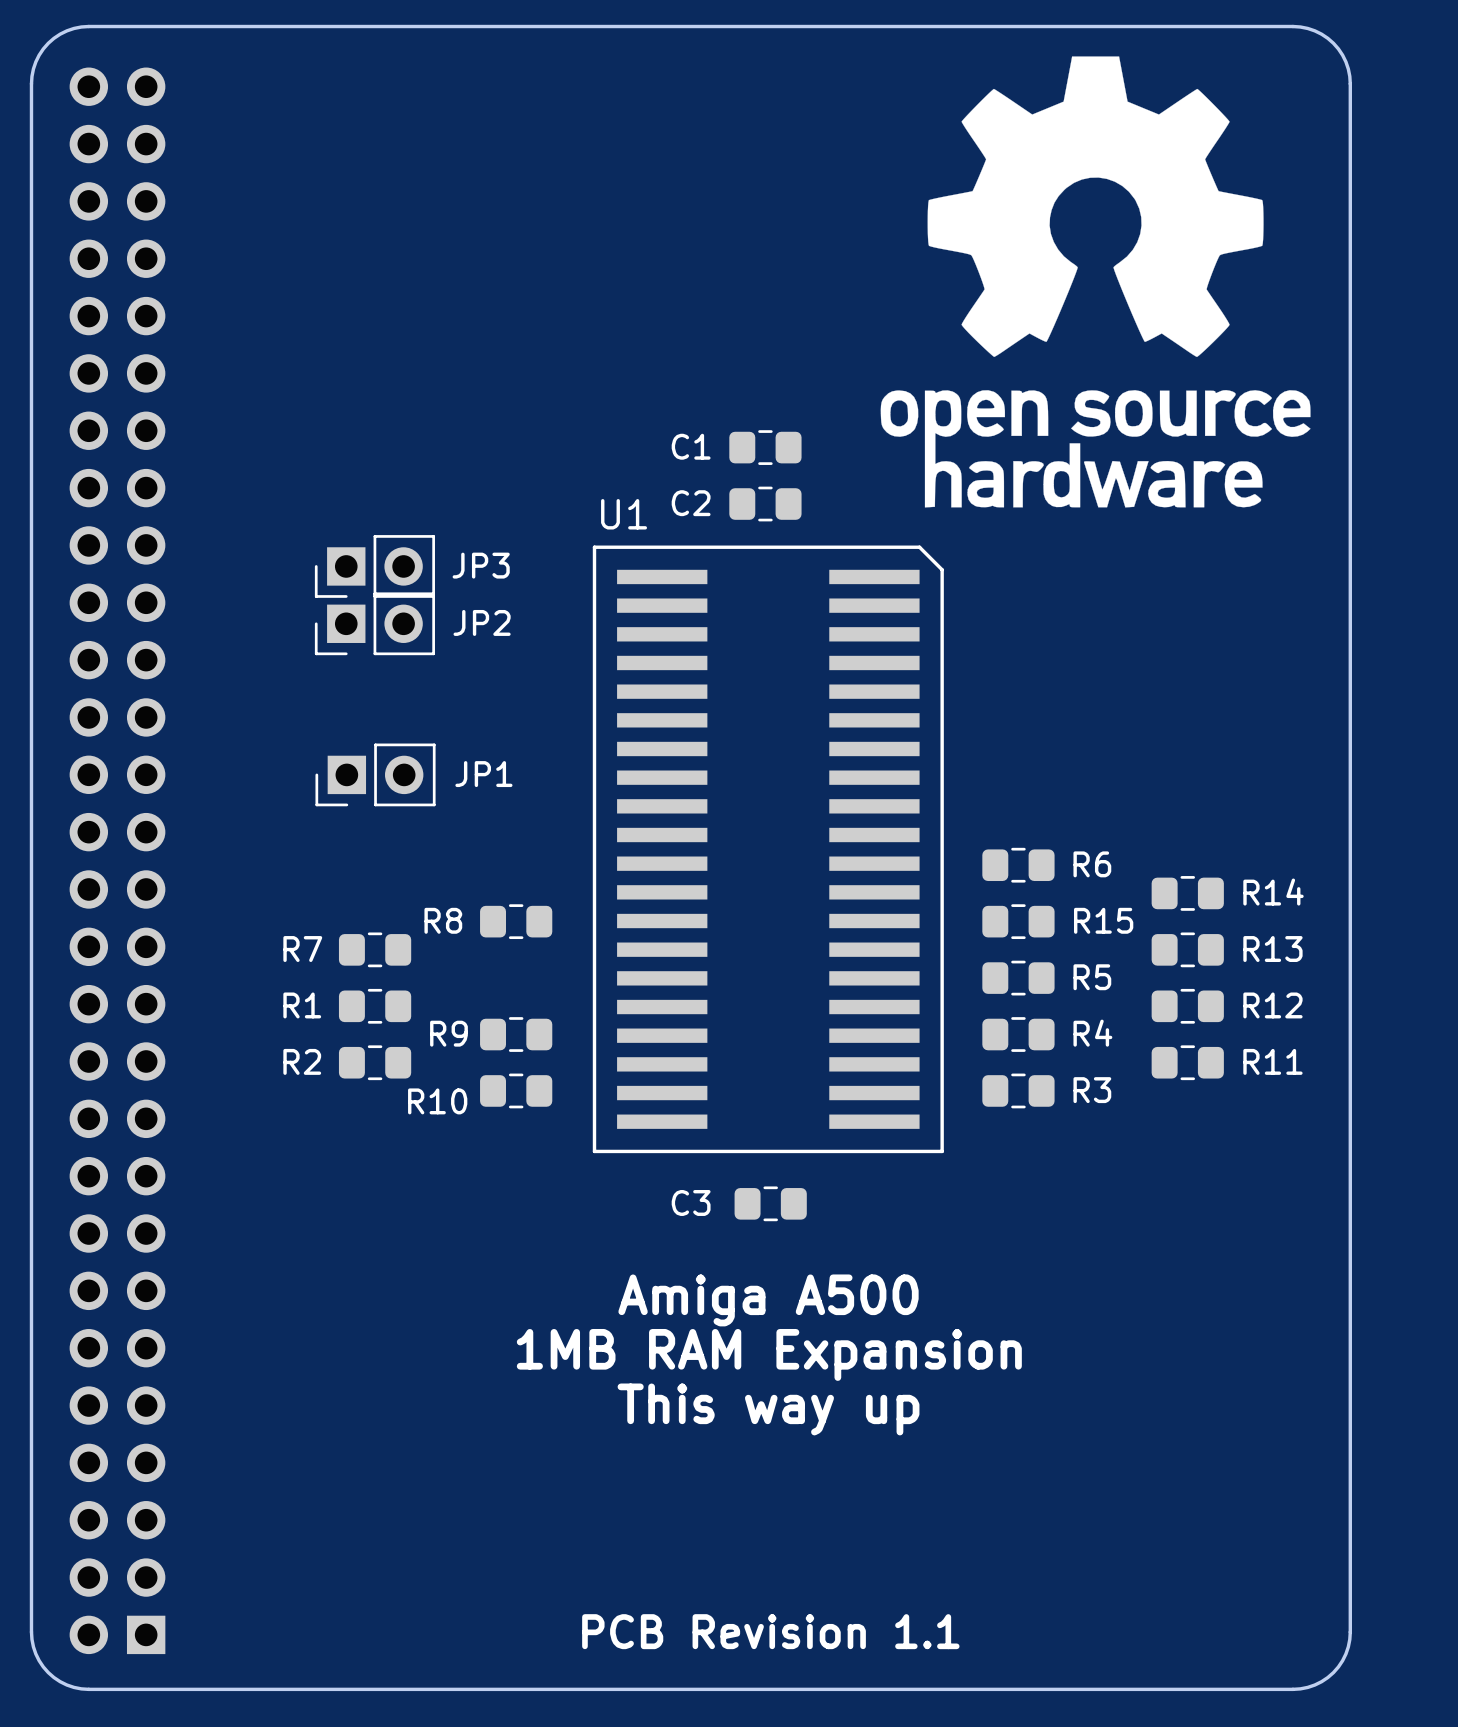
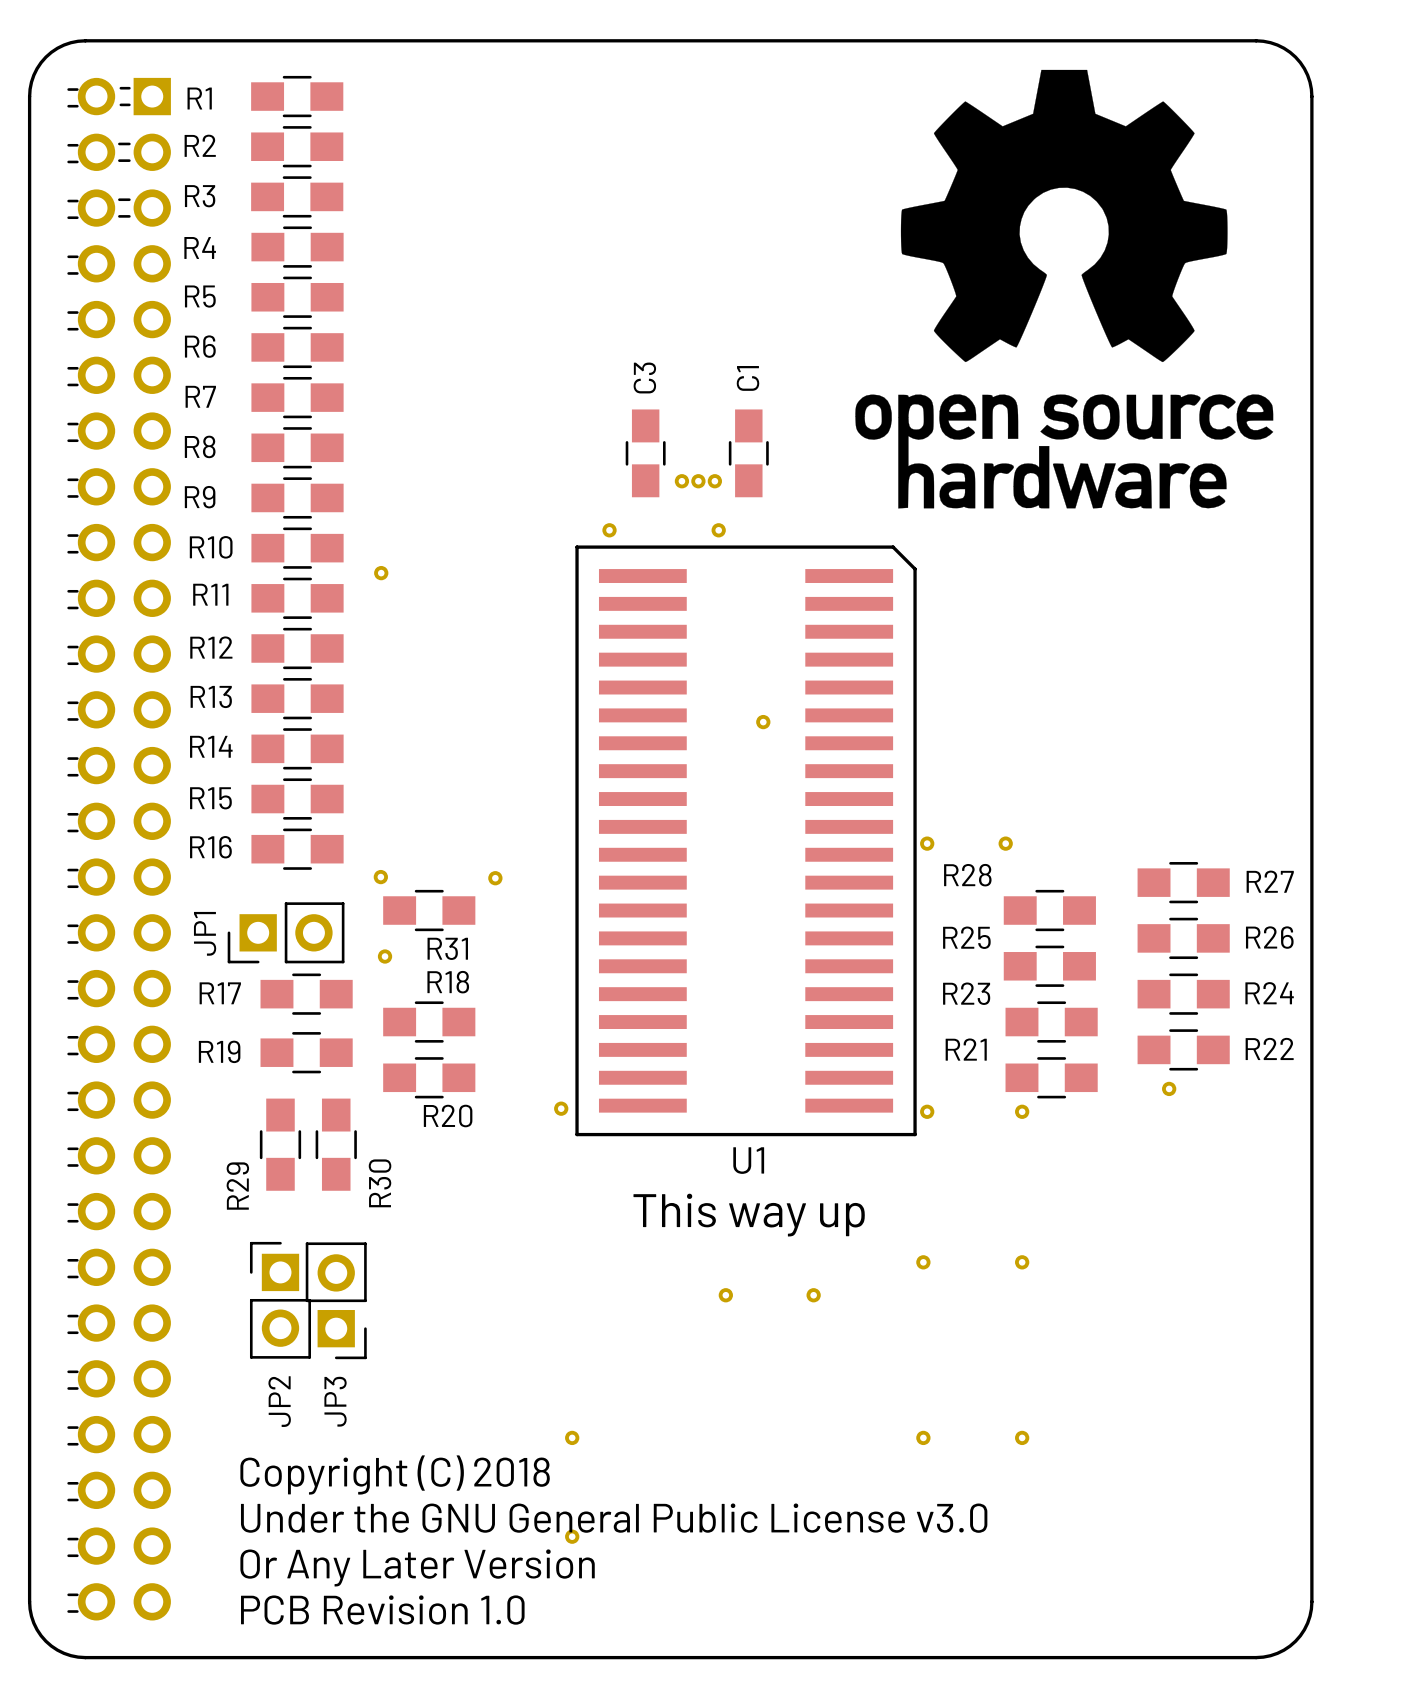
C1 footprint: [729, 430, 802, 465] -> [728, 409, 769, 498]
C1 name position: C1 (691, 446) -> C1 (747, 378)
part: none -> (681, 481)
part: none -> (698, 481)
part: none -> (714, 481)
C2: (765, 504) -> none
U1 name position: U1 (624, 514) -> U1 (748, 1160)
part: none -> (609, 530)
part: none -> (718, 530)
JP3 name position: JP3 (481, 565) -> JP3 (335, 1401)
JP3 rotation: 0° (374, 566) -> 90° counterclockwise (336, 1300)
JP3 position: (374, 566) -> (336, 1300)
part: none -> (381, 573)
JP2 rotation: 0° (374, 623) -> 90° clockwise (280, 1300)
JP2 position: (374, 623) -> (280, 1300)
part: none -> (763, 722)
JP1 position: (375, 774) -> (286, 932)
JP1 name rotation: 0° (483, 774) -> 90° counterclockwise (205, 933)
JP1 name position: JP1 (483, 774) -> JP1 (205, 933)
R6 footprint: [982, 847, 1055, 883] -> [251, 326, 344, 369]
part: none -> (927, 843)
part: none -> (1005, 843)
R16: none -> (297, 849)
part side: bottom (117, 860) -> top (119, 849)
R6 name position: R6 (1092, 864) -> R6 (200, 346)
R14 footprint: [1151, 876, 1224, 911] -> [251, 728, 344, 770]
part: none -> (380, 877)
part: none -> (495, 878)
R27: none -> (1183, 882)
R14 name position: R14 (1273, 892) -> R14 (211, 746)
R8 footprint: [480, 904, 553, 940] -> [251, 427, 344, 469]
R15 footprint: [982, 904, 1055, 940] -> [251, 778, 344, 820]
R15 name position: R15 (1103, 920) -> R15 (210, 798)
R31: none -> (429, 910)
R28: none -> (1049, 910)
R7 footprint: [338, 932, 412, 968] -> [251, 376, 344, 419]
R13 footprint: [1151, 932, 1224, 968] -> [251, 678, 344, 720]
R26: none -> (1183, 938)
R13 name position: R13 (1272, 949) -> R13 (211, 696)
R5 footprint: [982, 960, 1055, 996] -> [251, 276, 344, 318]
part: none -> (385, 956)
R5 name position: R5 (1092, 977) -> R5 (200, 296)
R25: none -> (1049, 966)
R1 footprint: [338, 988, 412, 1024] -> [251, 75, 344, 118]
R12 footprint: [1151, 988, 1224, 1024] -> [251, 627, 344, 670]
R12 name position: R12 (1272, 1005) -> R12 (211, 647)
R17: none -> (306, 994)
R24: none -> (1183, 994)
R9 footprint: [480, 1017, 553, 1052] -> [251, 477, 344, 519]
R4 footprint: [982, 1017, 1055, 1052] -> [251, 226, 344, 268]
R4 name position: R4 (1092, 1033) -> R4 (200, 247)
R18: none -> (429, 1022)
R23: none -> (1051, 1022)
R2 footprint: [338, 1045, 412, 1081] -> [251, 126, 344, 168]
R11 footprint: [1151, 1045, 1224, 1081] -> [251, 577, 344, 619]
R11 name position: R11 (1272, 1061) -> R11 (210, 594)
R22: none -> (1183, 1049)
R19: none -> (306, 1052)
R10 footprint: [480, 1073, 553, 1109] -> [251, 527, 344, 569]
R3 footprint: [982, 1073, 1055, 1109] -> [251, 176, 344, 218]
R3 name position: R3 (1092, 1090) -> R3 (200, 196)
R20: none -> (429, 1077)
R21: none -> (1051, 1077)
part: none -> (1169, 1088)
part: none -> (561, 1108)
part: none -> (927, 1111)
part: none -> (1022, 1111)
R29: none -> (280, 1144)
R30: none -> (336, 1144)
C3 footprint: [734, 1186, 807, 1222] -> [625, 409, 666, 498]
C3 name position: C3 (691, 1202) -> C3 (644, 377)
part: none -> (923, 1262)
part: none -> (1022, 1262)
text: Amiga A500 (768, 1300) -> none
part: none -> (725, 1295)
part: none -> (813, 1295)
text: 1MB RAM Expansion (769, 1354) -> none
text position: This way up (768, 1409) -> This way up (749, 1215)
part: none -> (572, 1437)
part: none -> (923, 1437)
part: none -> (1022, 1437)
text: none -> Copyright (C) 2018 (395, 1475)
text: none -> Under the GNU General Public License v3.0 (614, 1518)
part: none -> (572, 1536)
text: none -> Or Any Later Version (417, 1567)
text: PCB Revision 1.1 (770, 1631) -> PCB Revision 1.0 (382, 1610)

